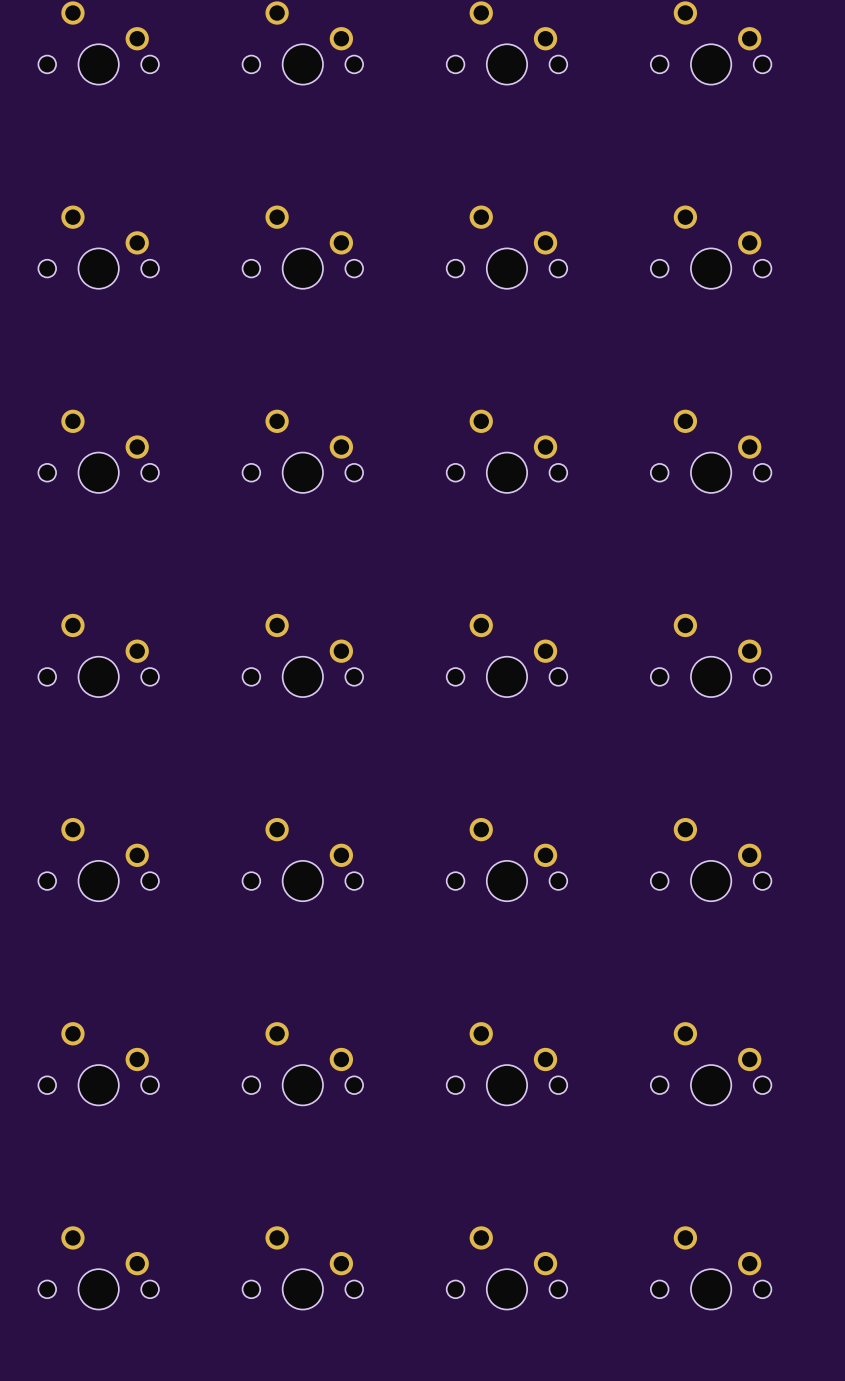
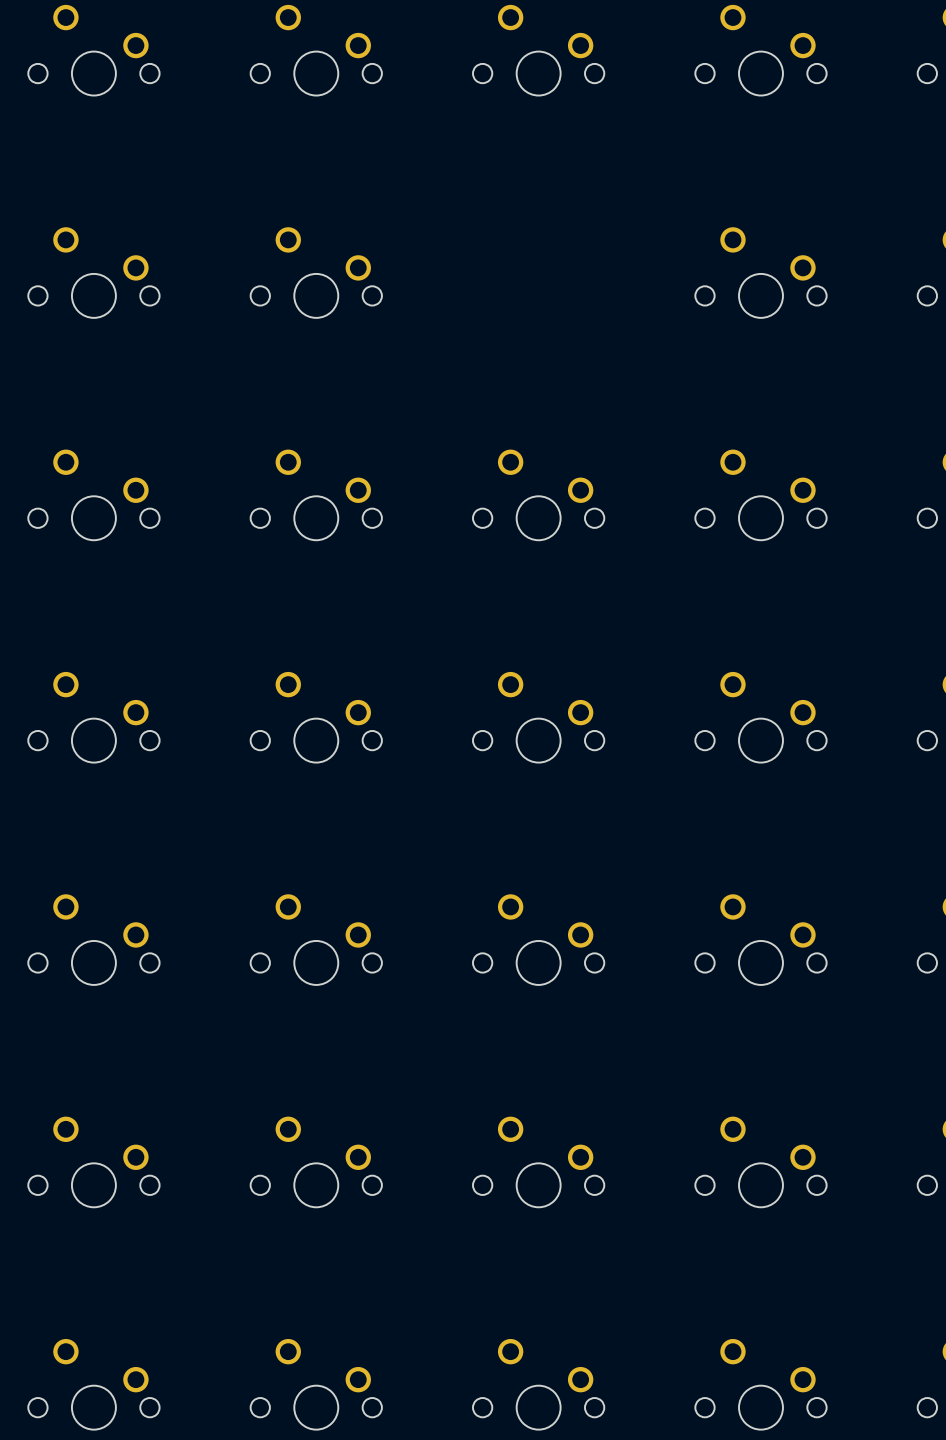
part: (506, 247) -> none

